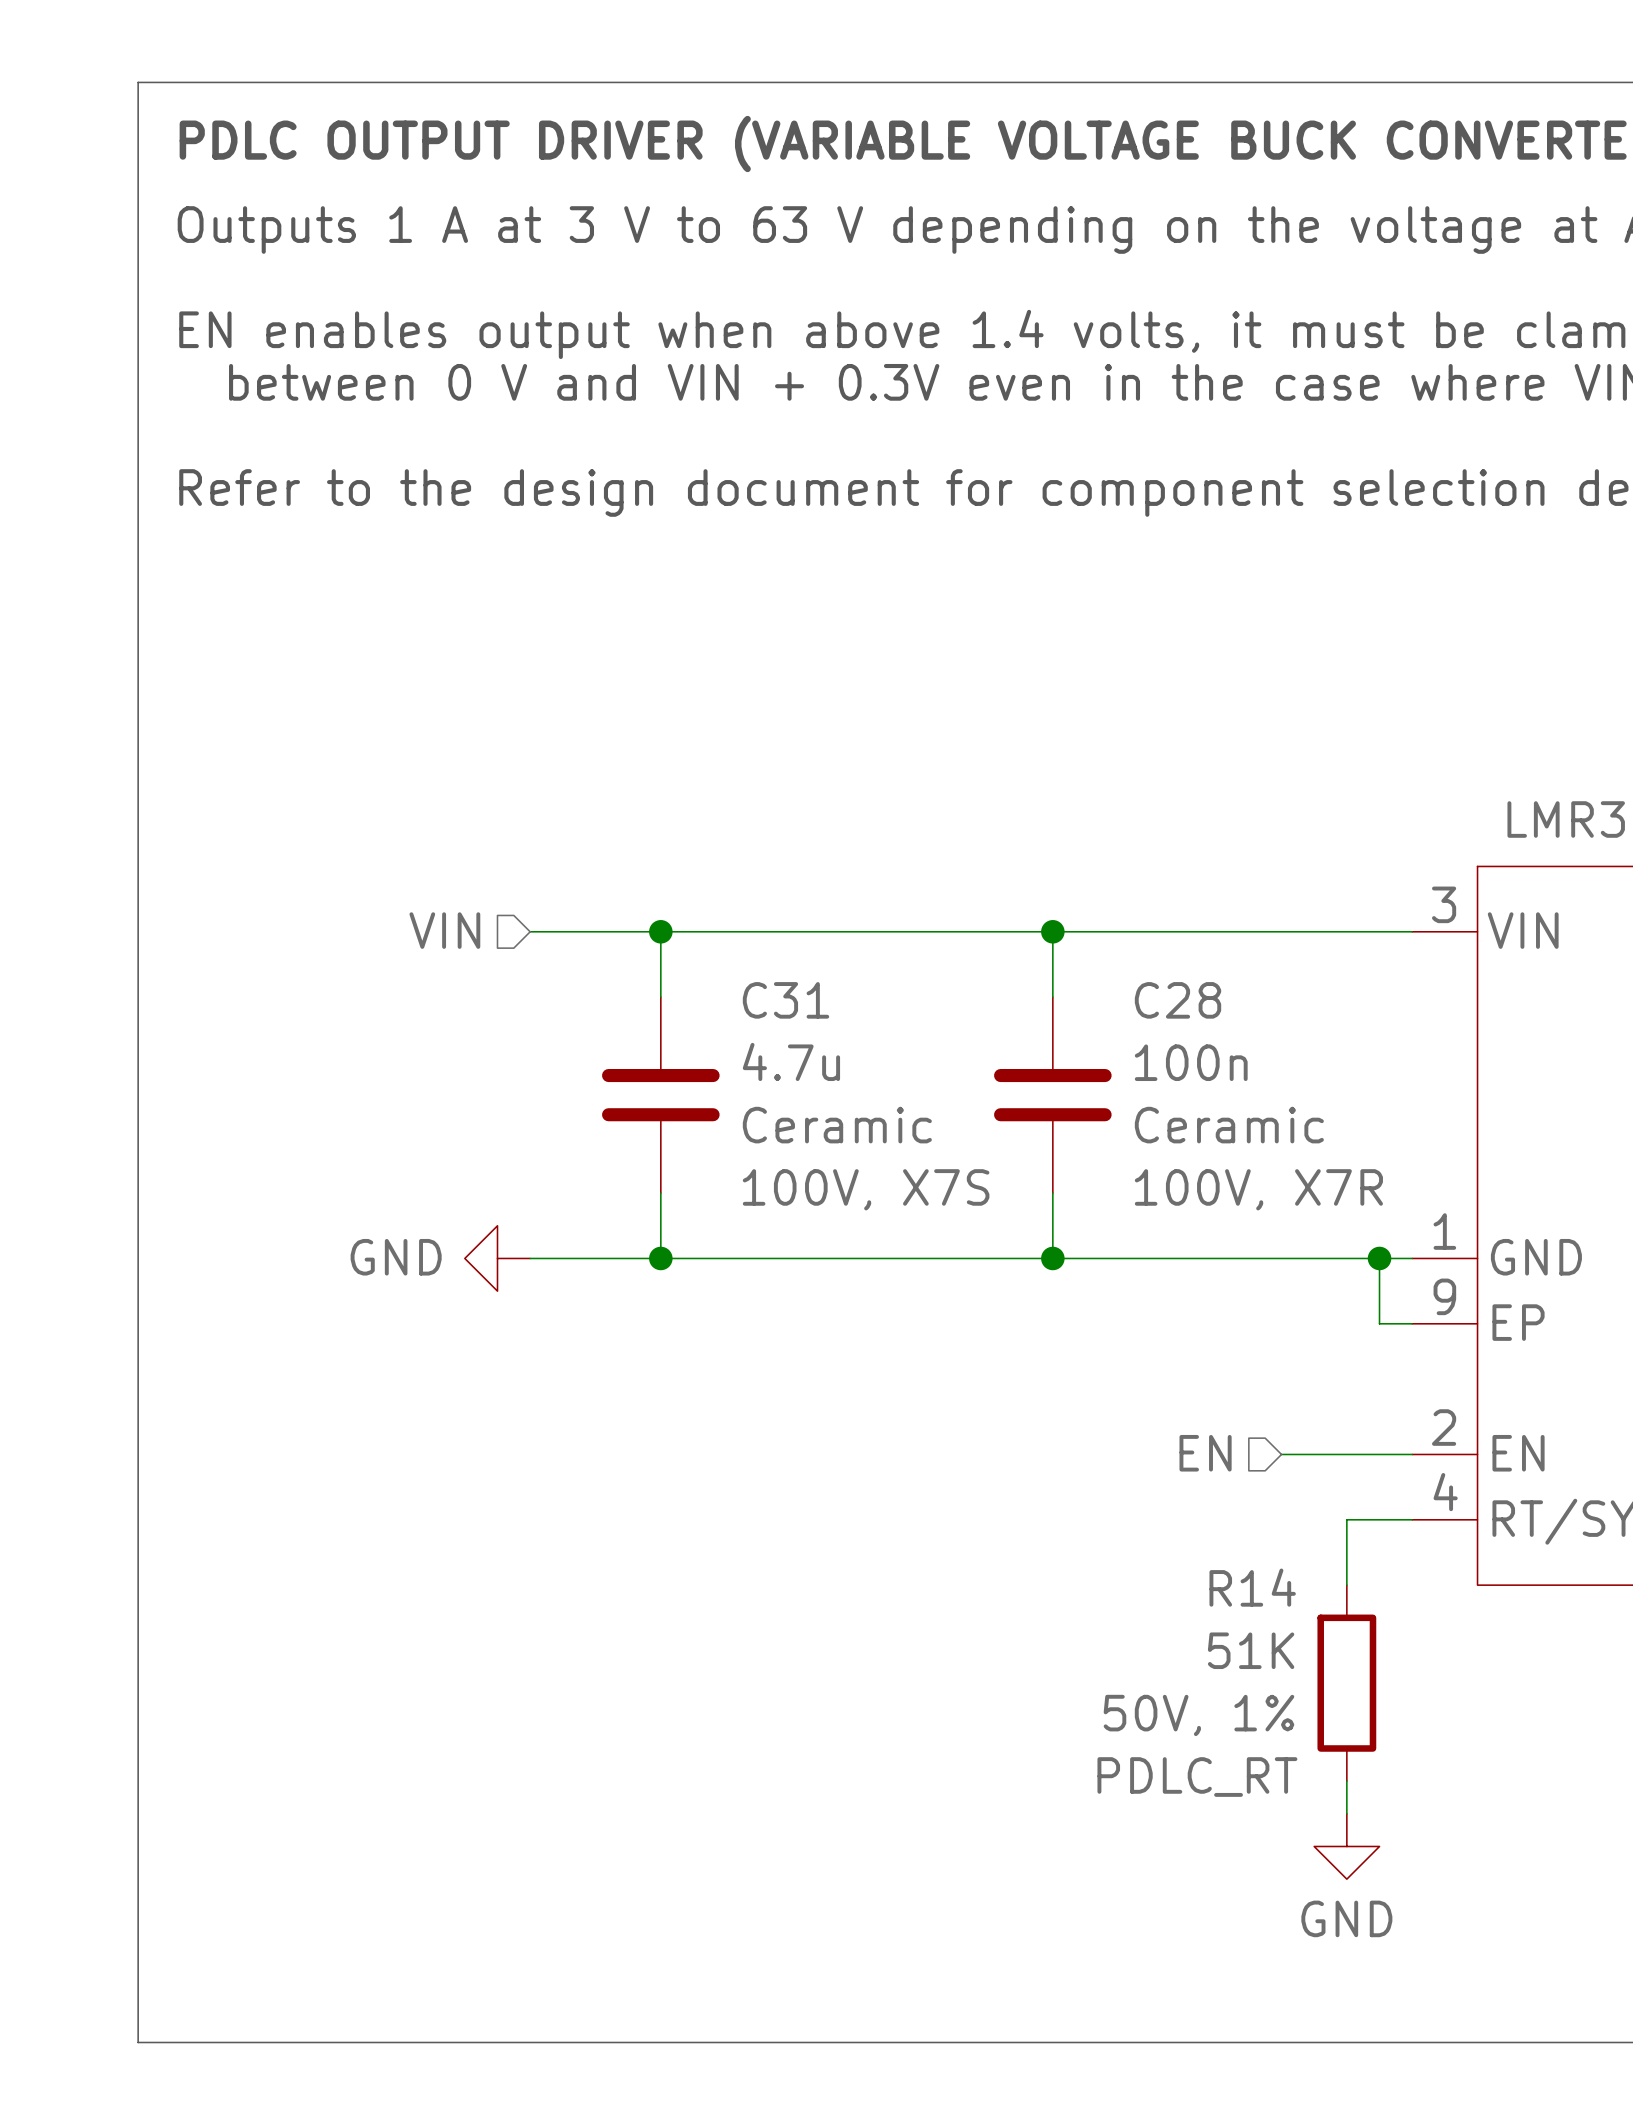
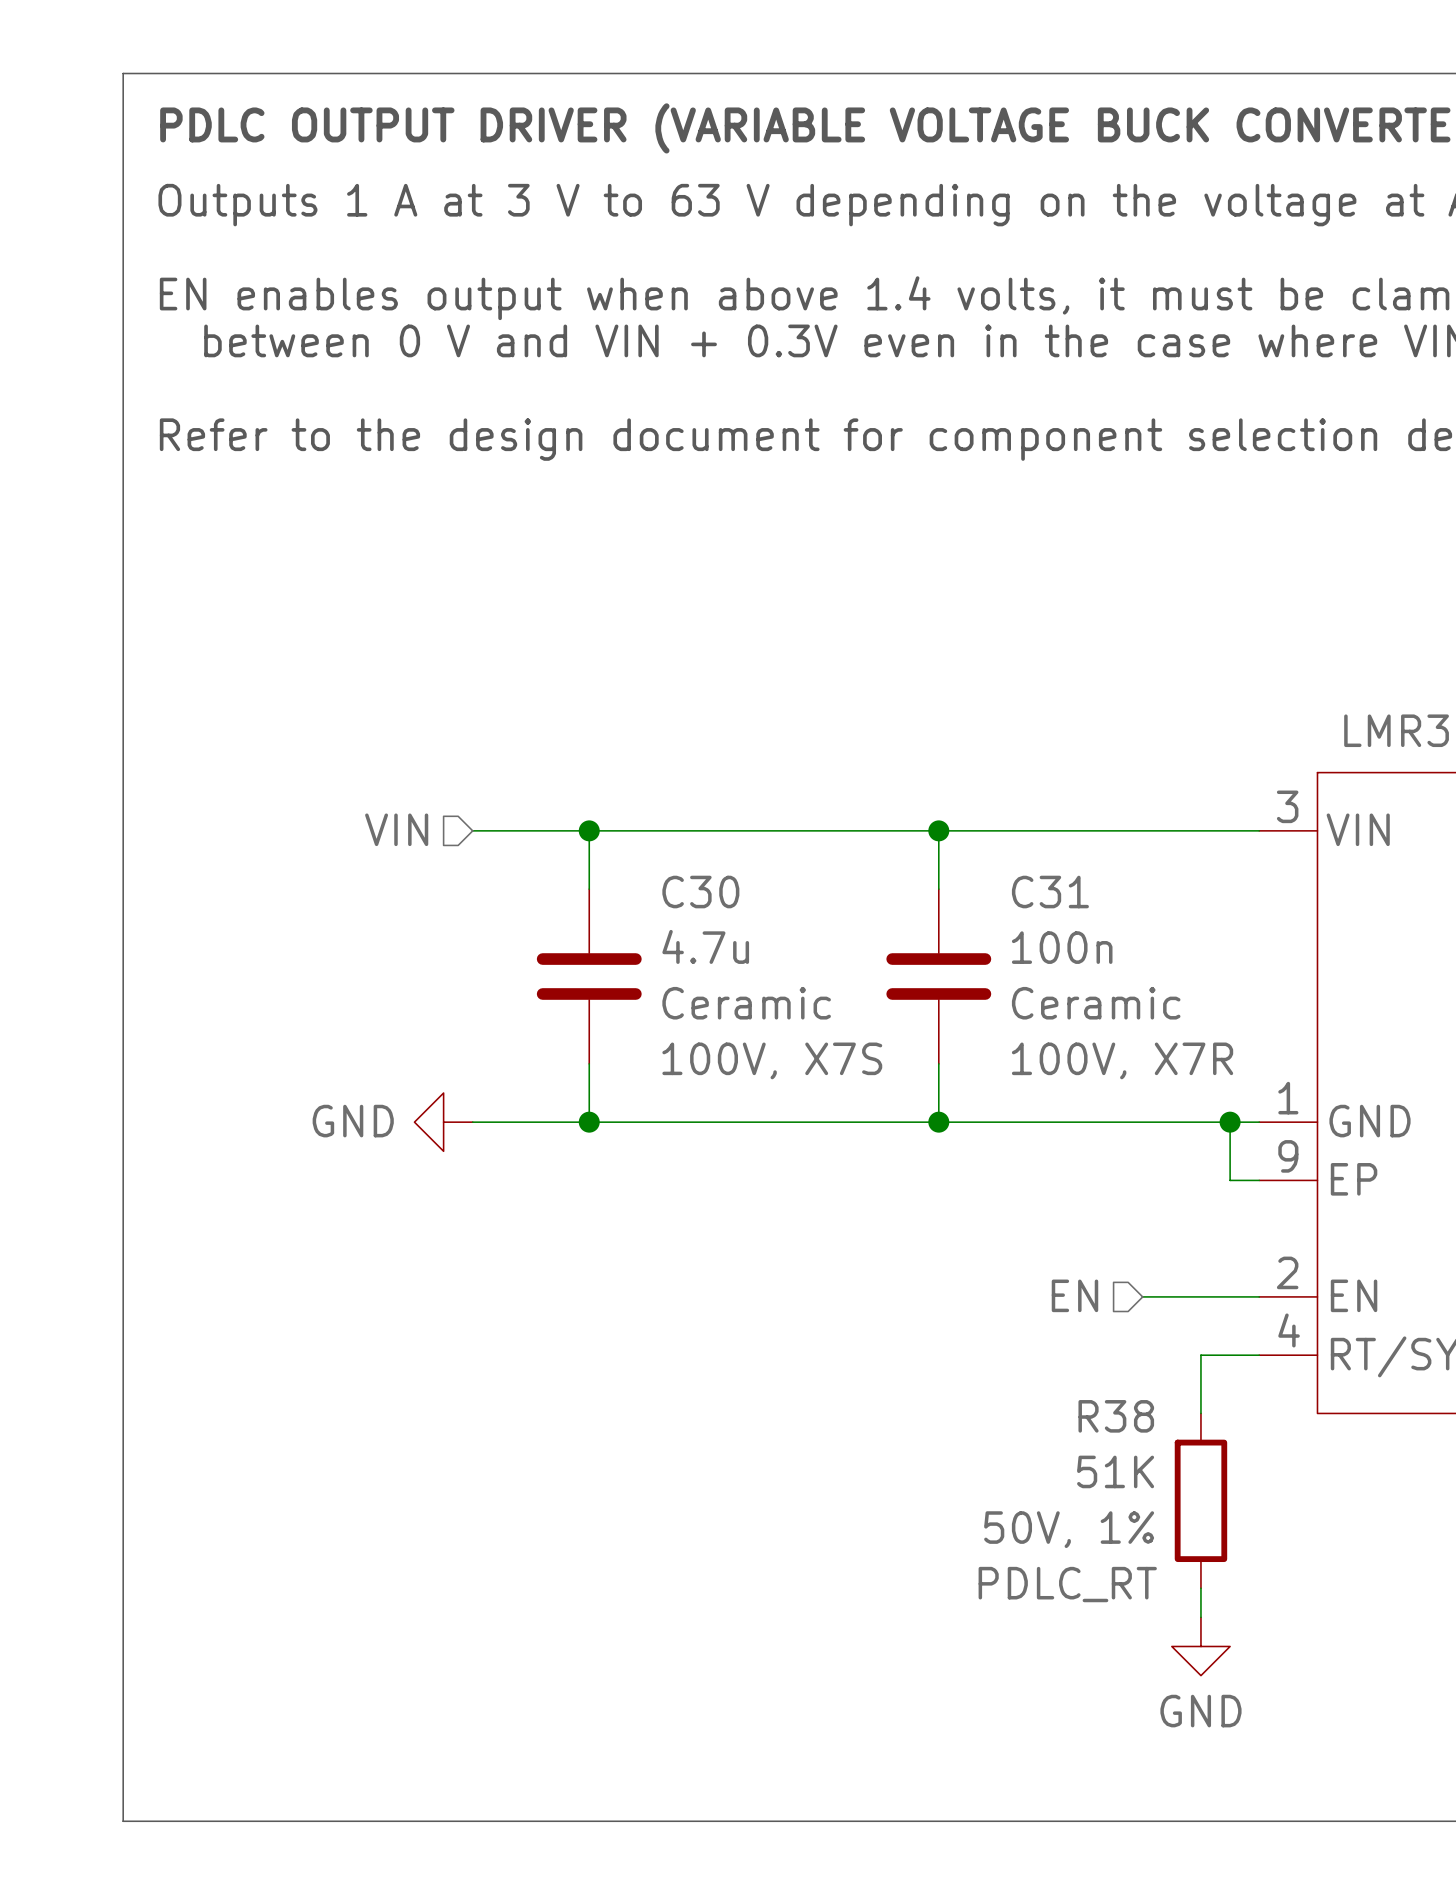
C31 name: C31 (785, 1000) -> C30 (700, 892)
C28 name: C28 (1178, 1000) -> C31 (1050, 892)
R14 name: R14 (1252, 1587) -> R38 (1116, 1416)

